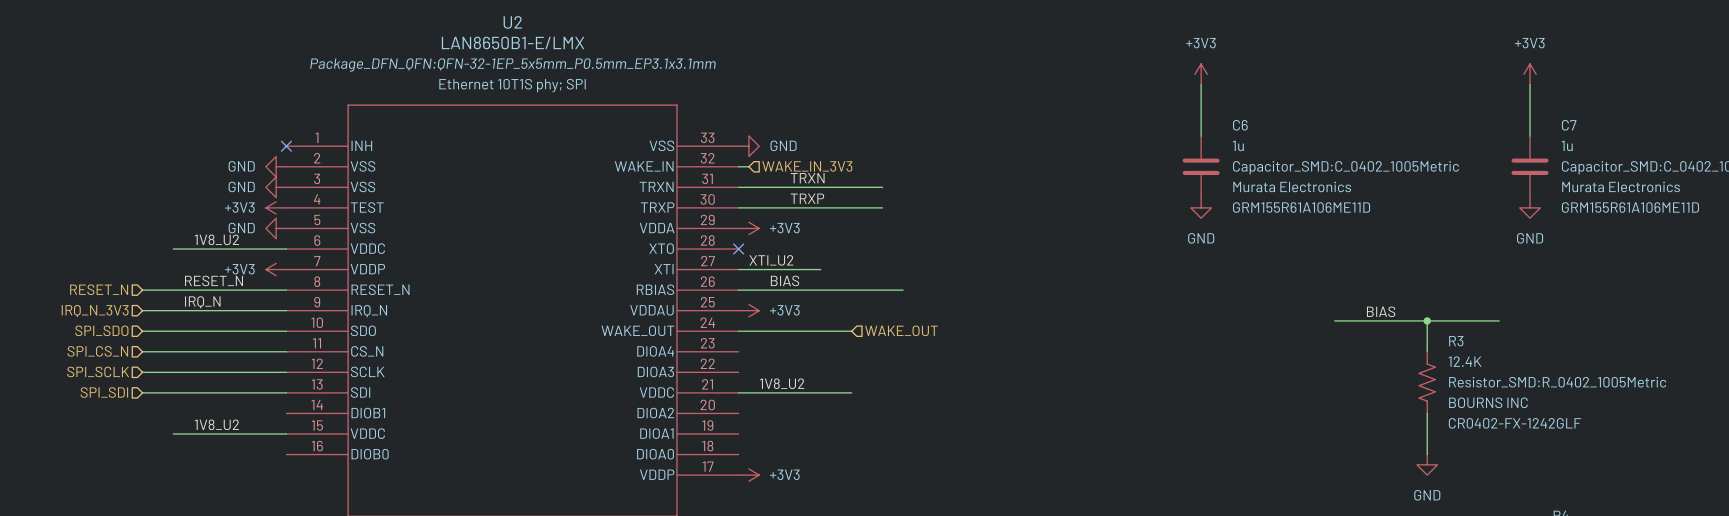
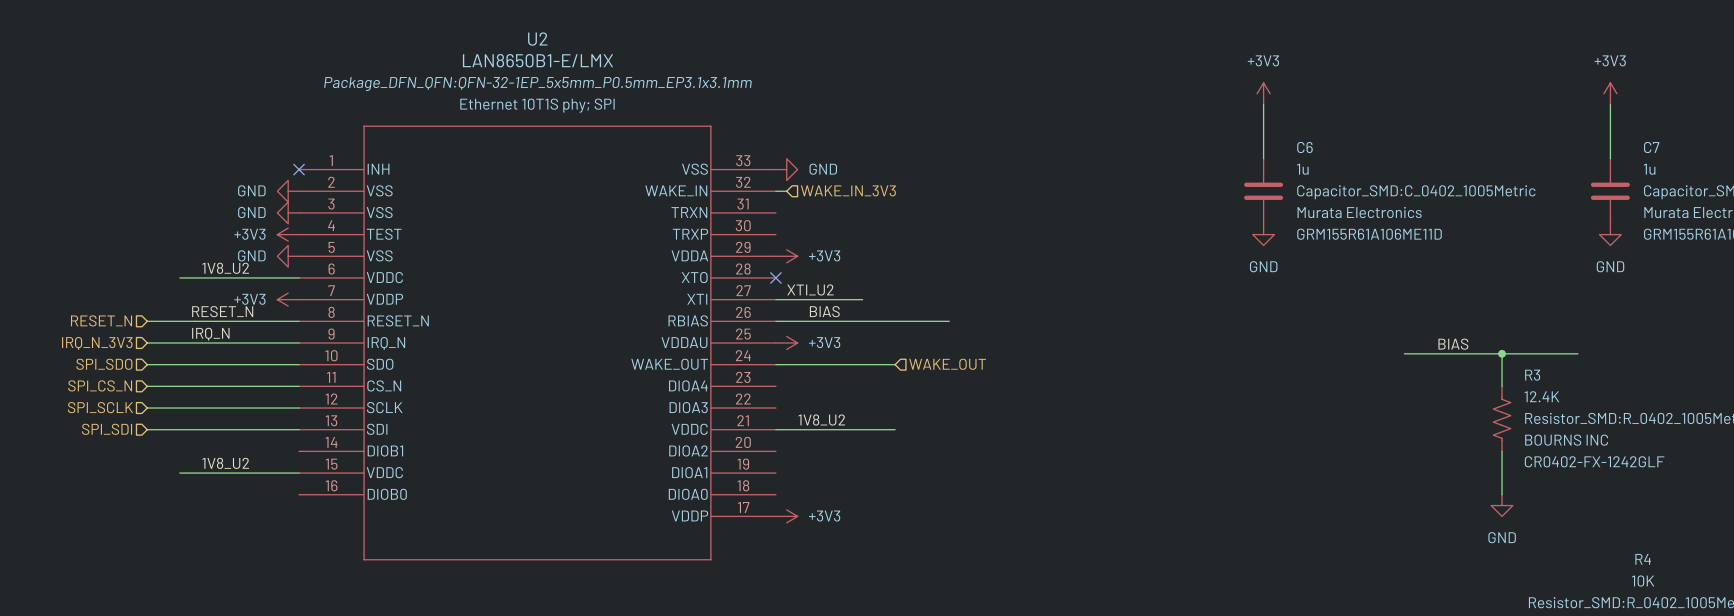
label: TRXN (807, 178) -> none
wire: (738, 187) (882, 187) -> none
label: TRXP (807, 198) -> none
wire: (738, 207) (882, 207) -> none

